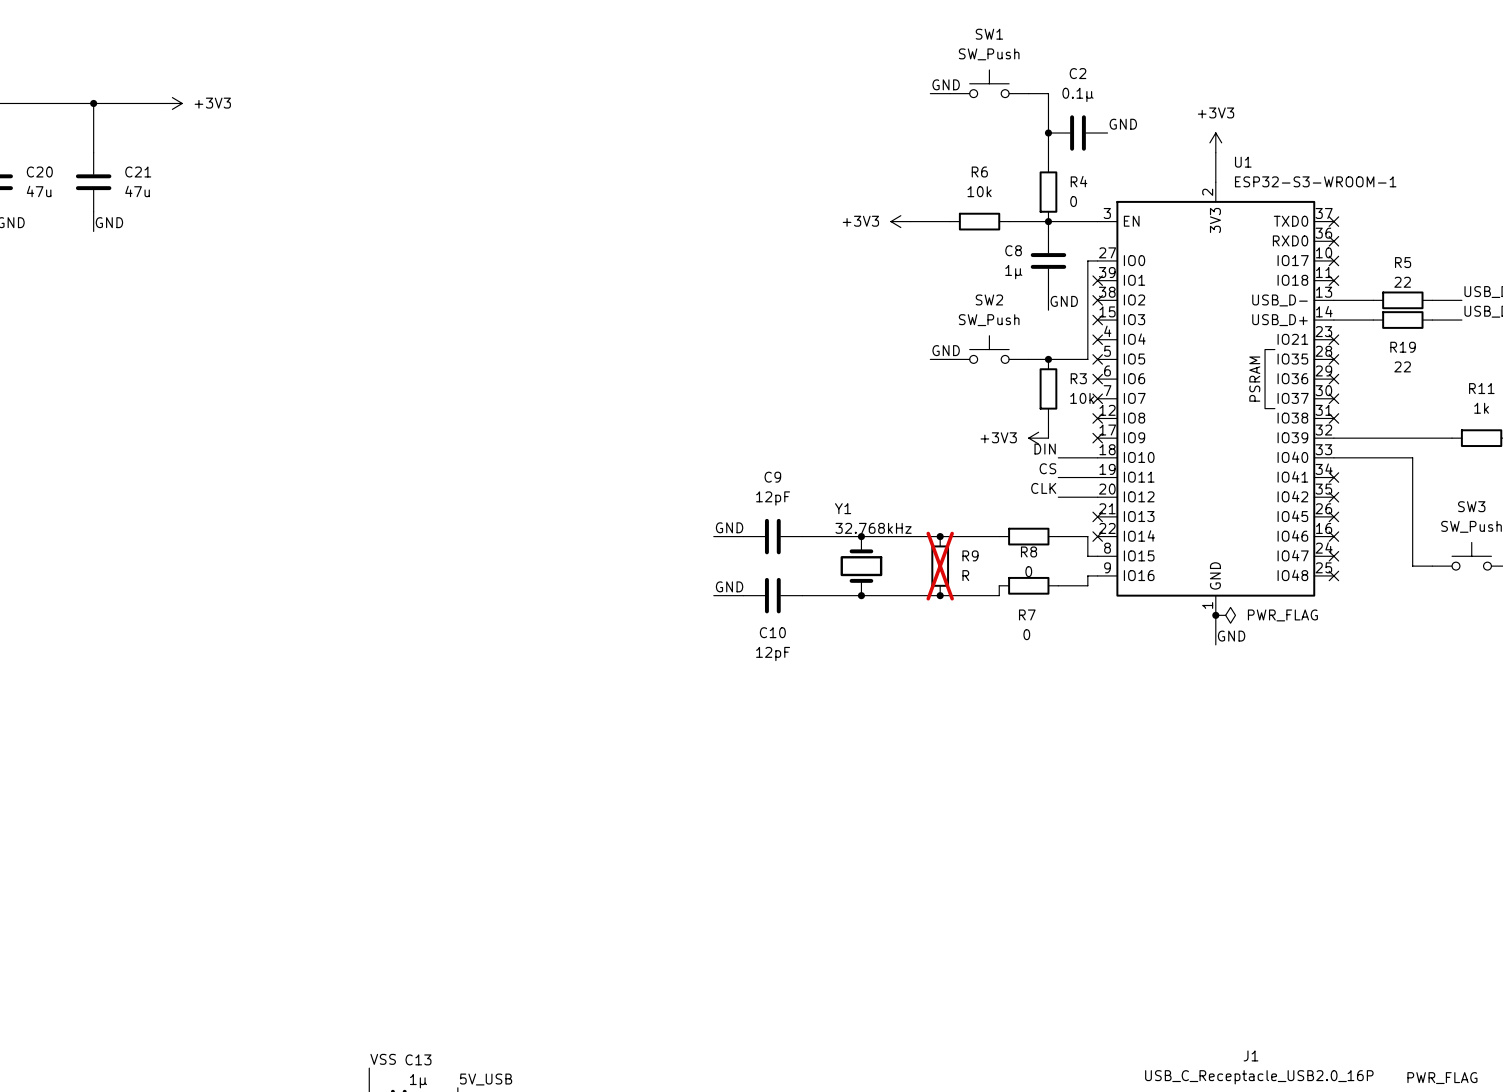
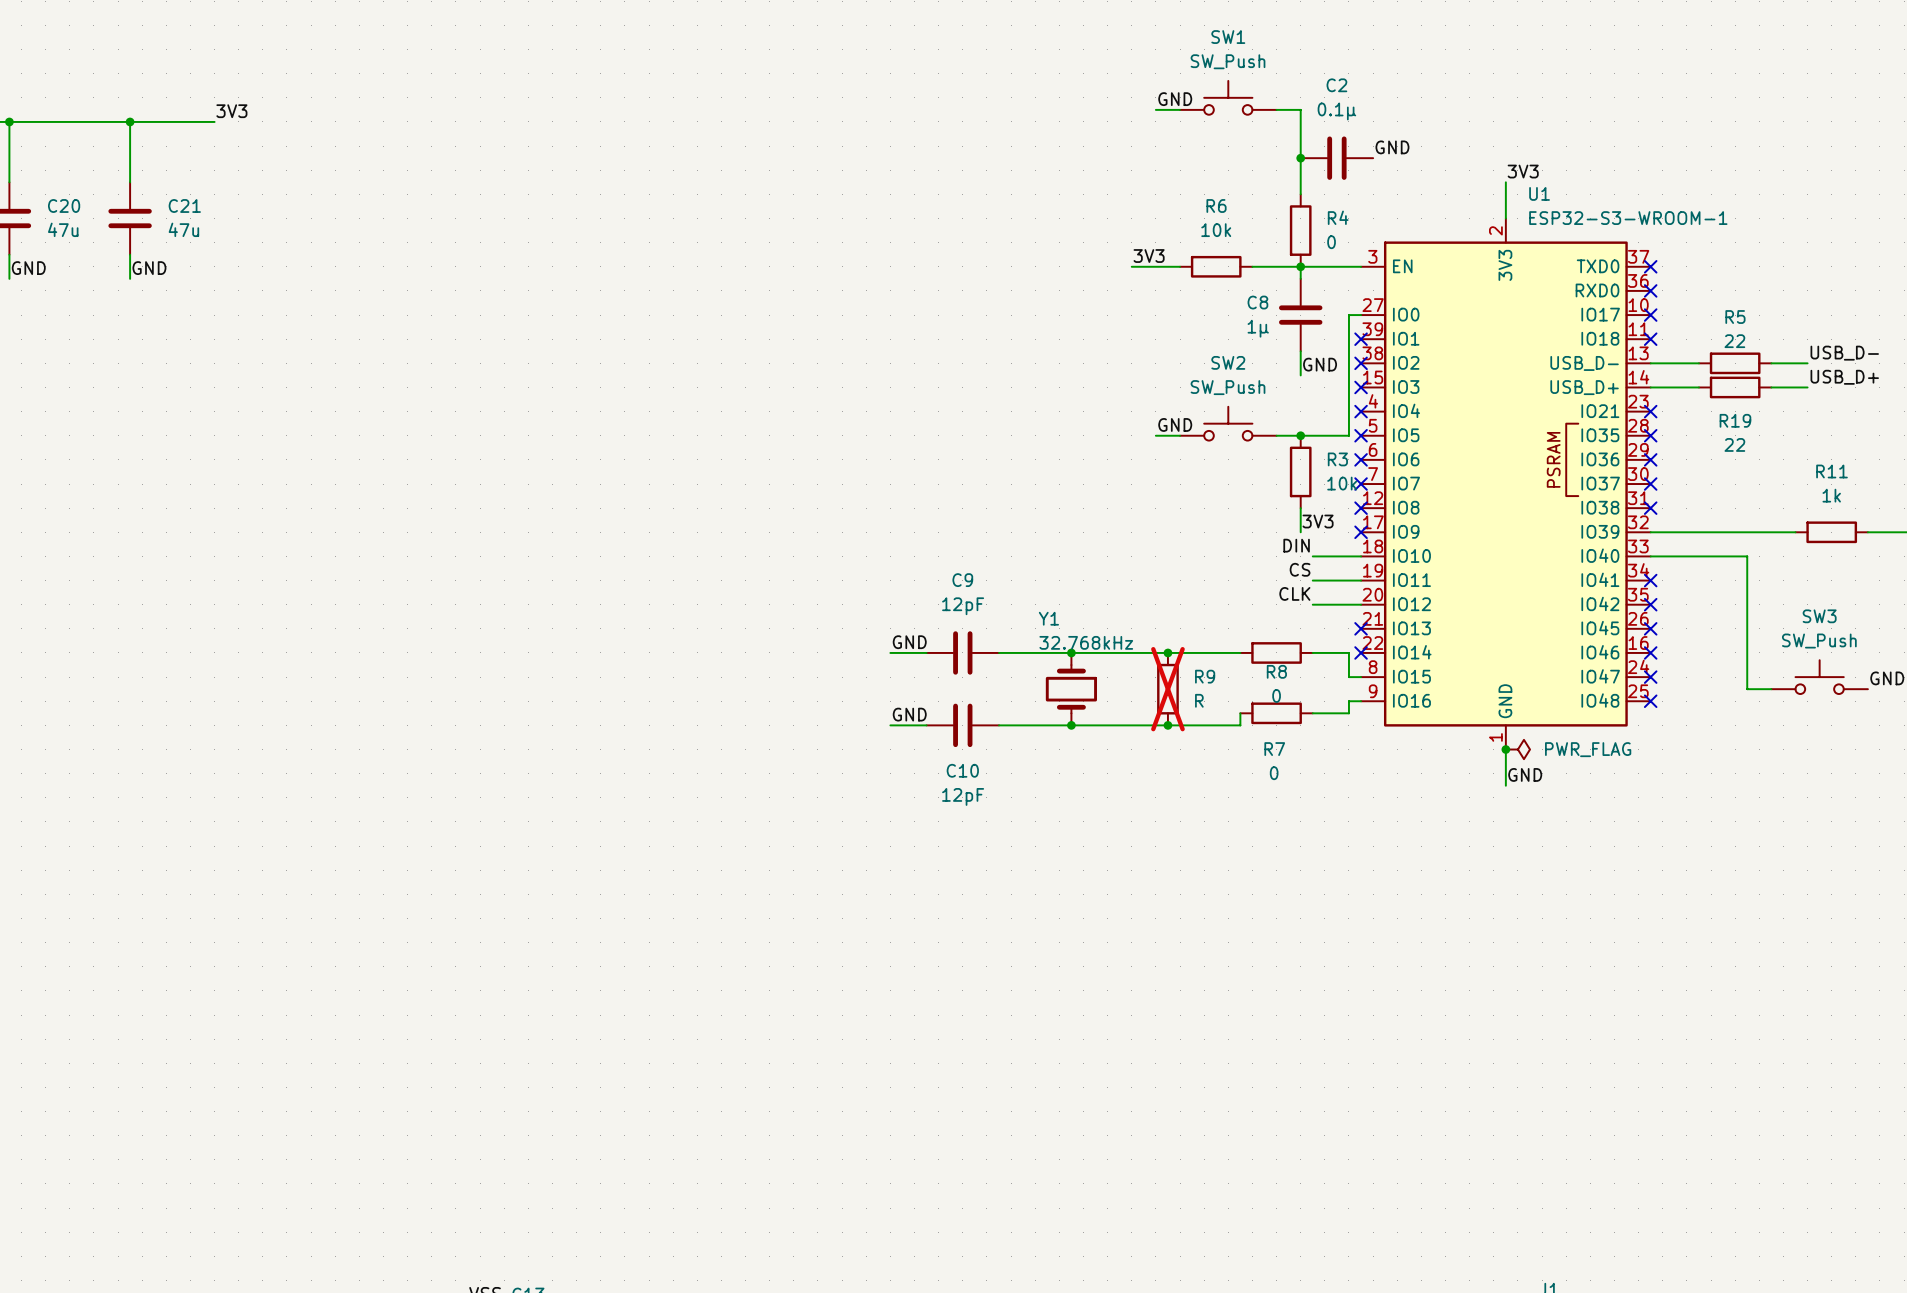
label: none -> 3V3 (231, 111)
power symbol: +3V3 (172, 103) -> none
power symbol: +3V3 (1215, 142) -> none
label: none -> 3V3 (1523, 171)
label: none -> 3V3 (1149, 256)
power symbol: +3V3 (900, 221) -> none
label: none -> 3V3 (1318, 521)
power symbol: +3V3 (1038, 438) -> none

